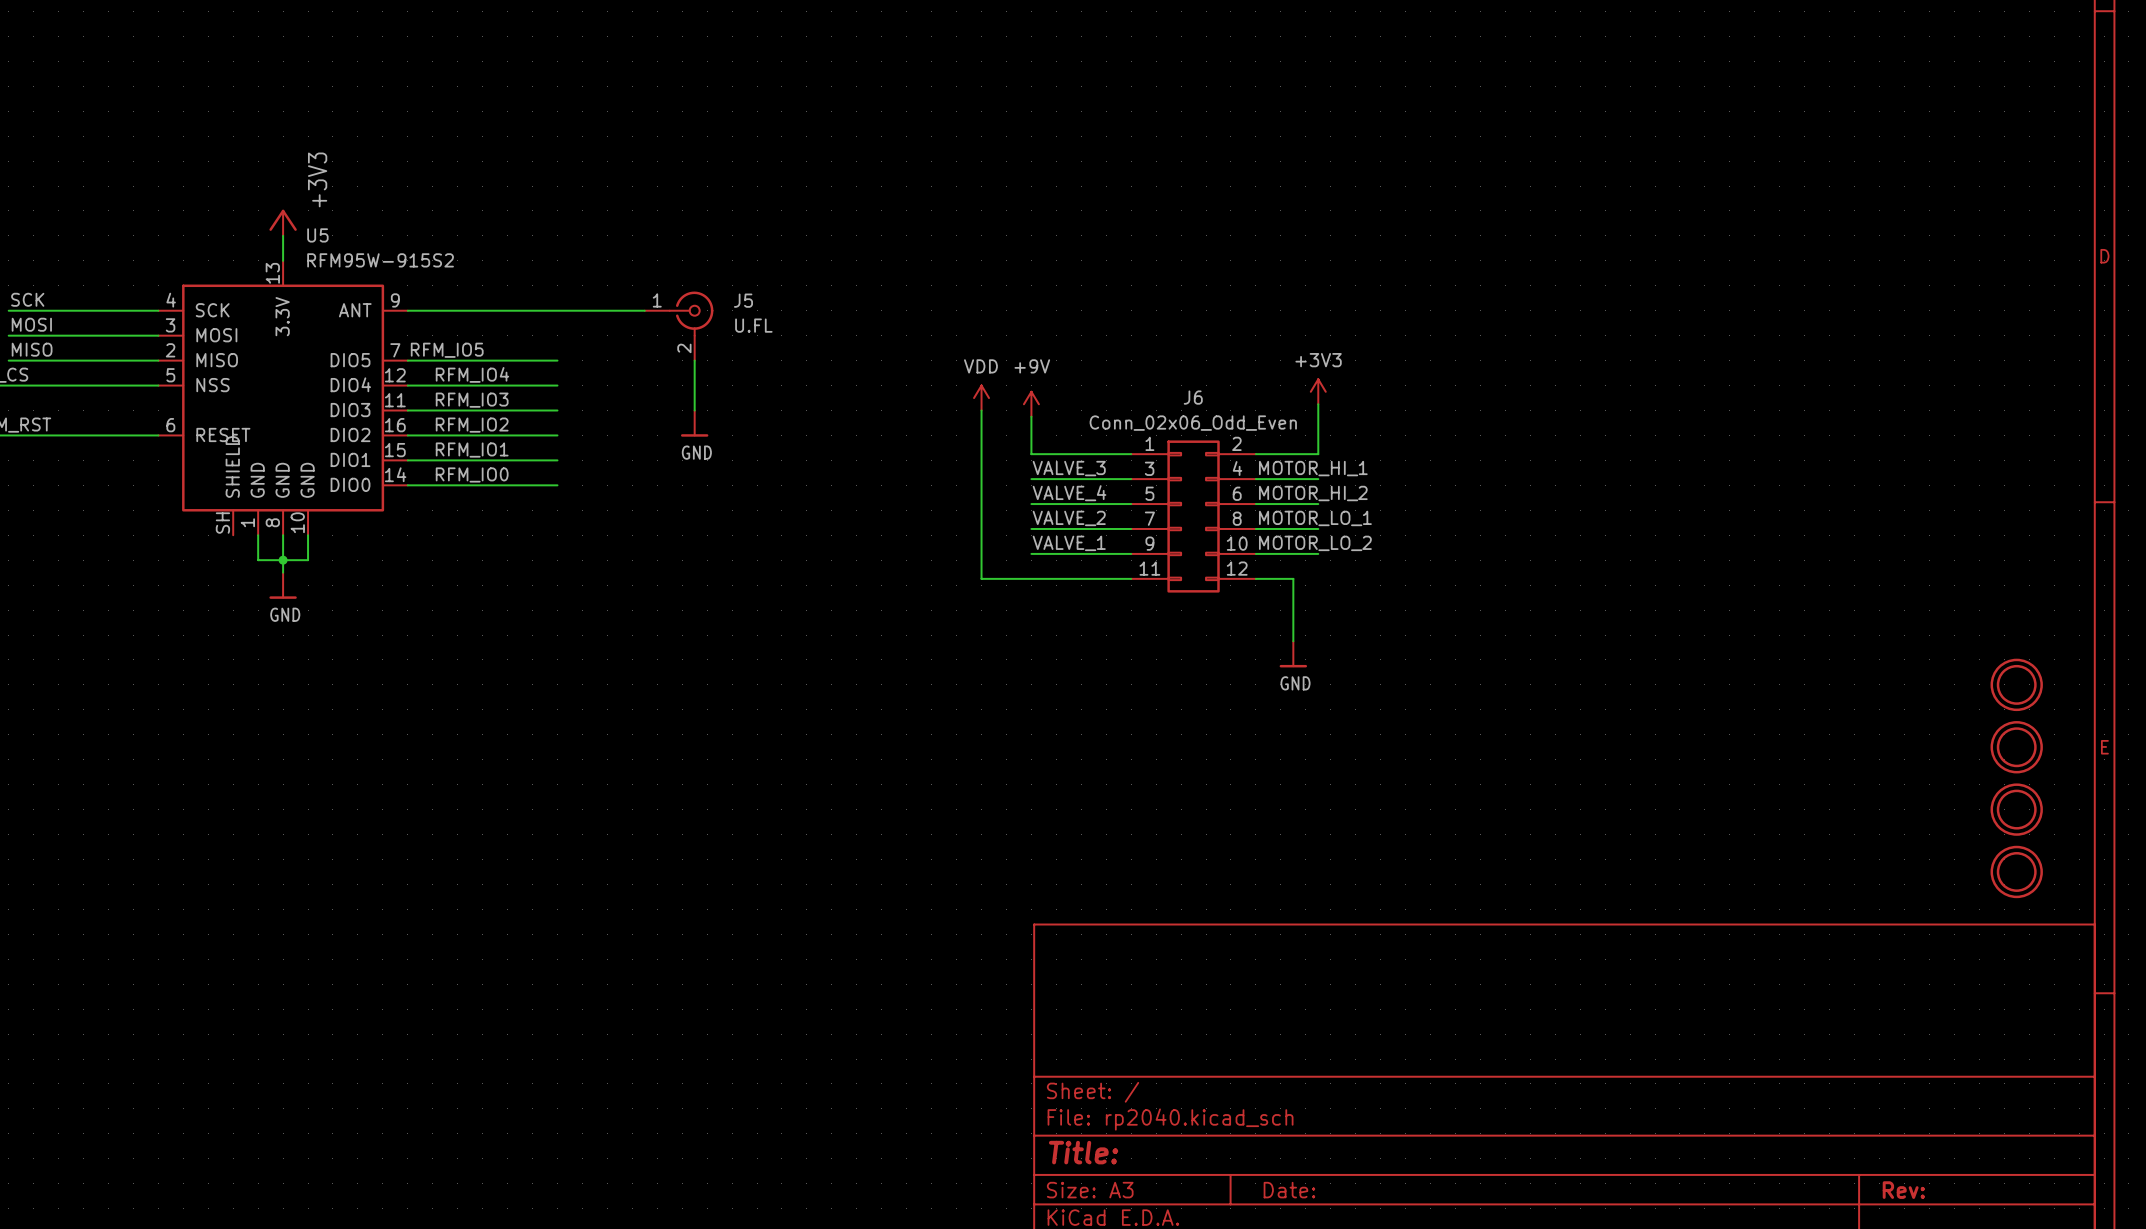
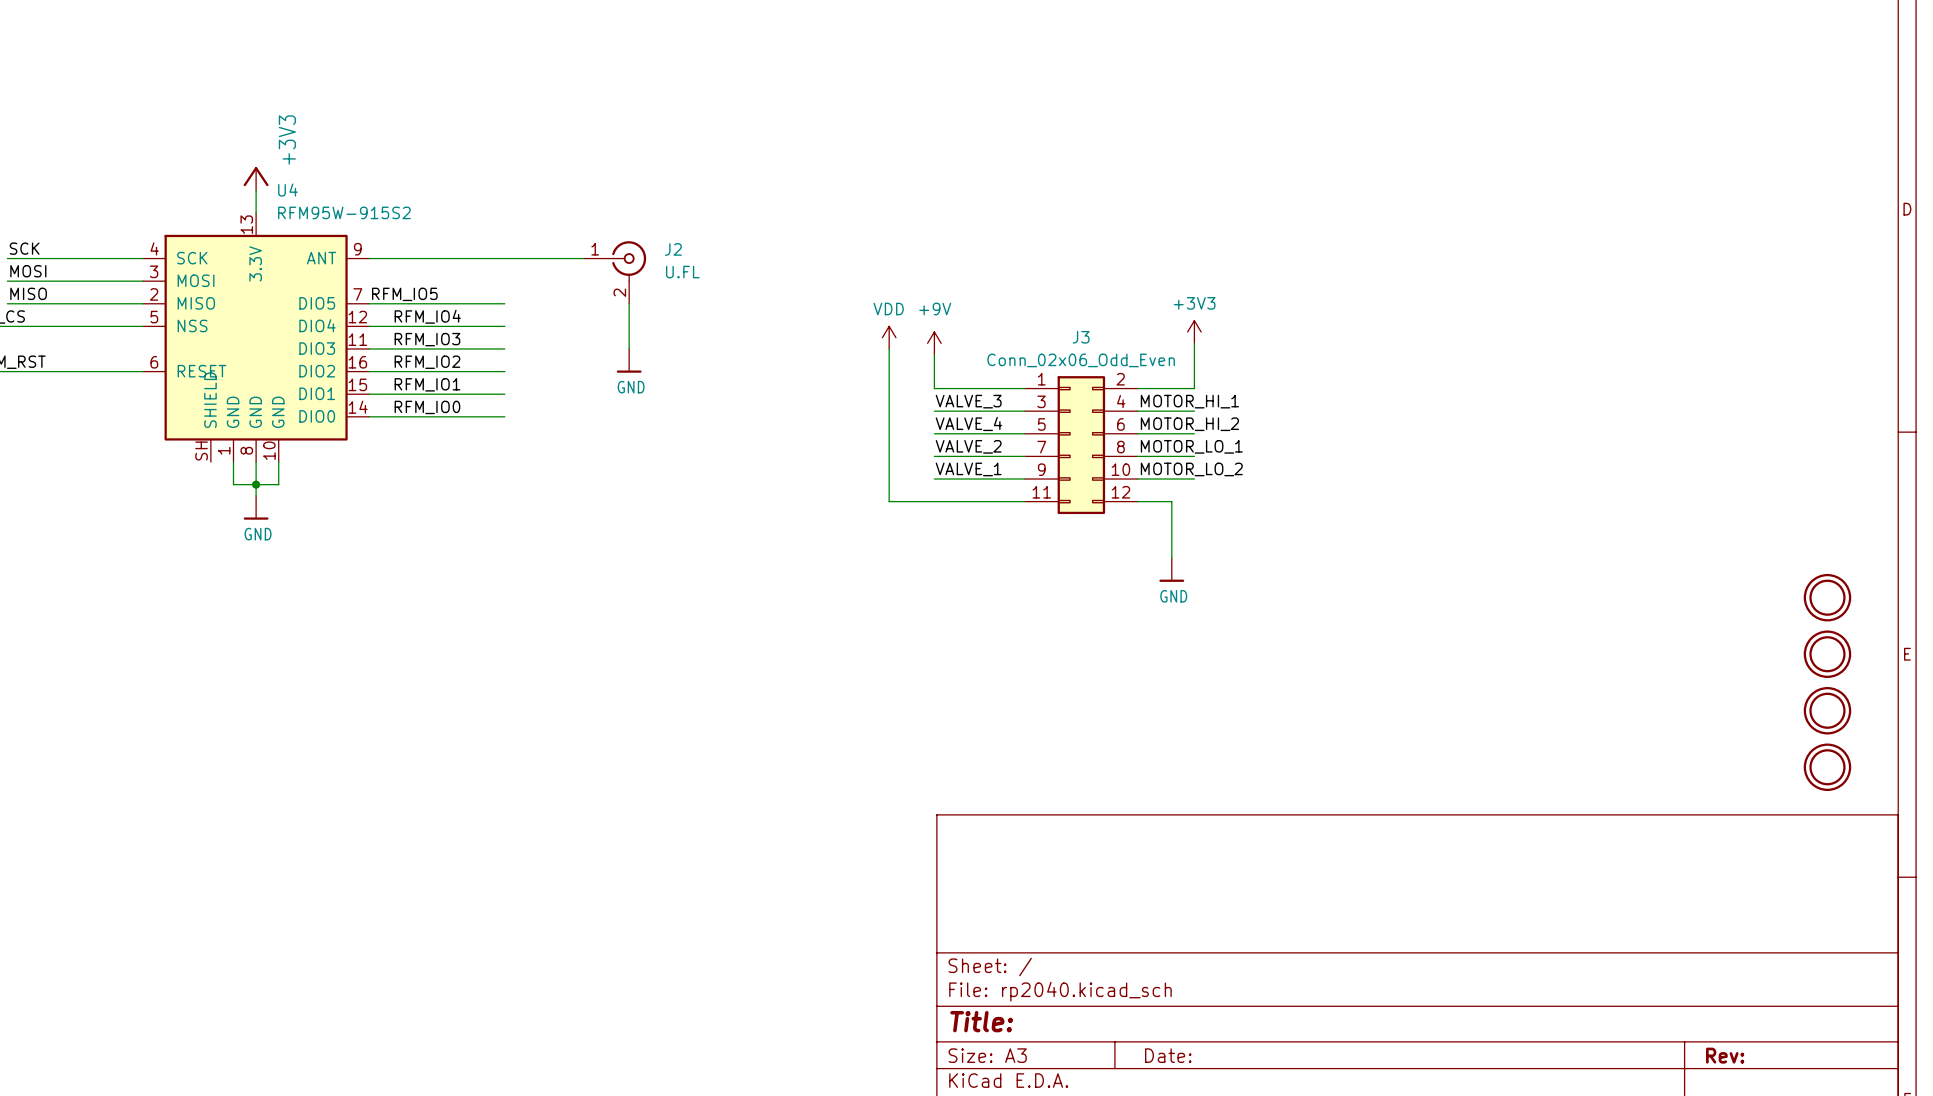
U5 name: U5 (317, 235) -> U4 (287, 190)
J5 name: J5 (743, 300) -> J2 (673, 249)
J6 name: J6 (1193, 397) -> J3 (1081, 337)

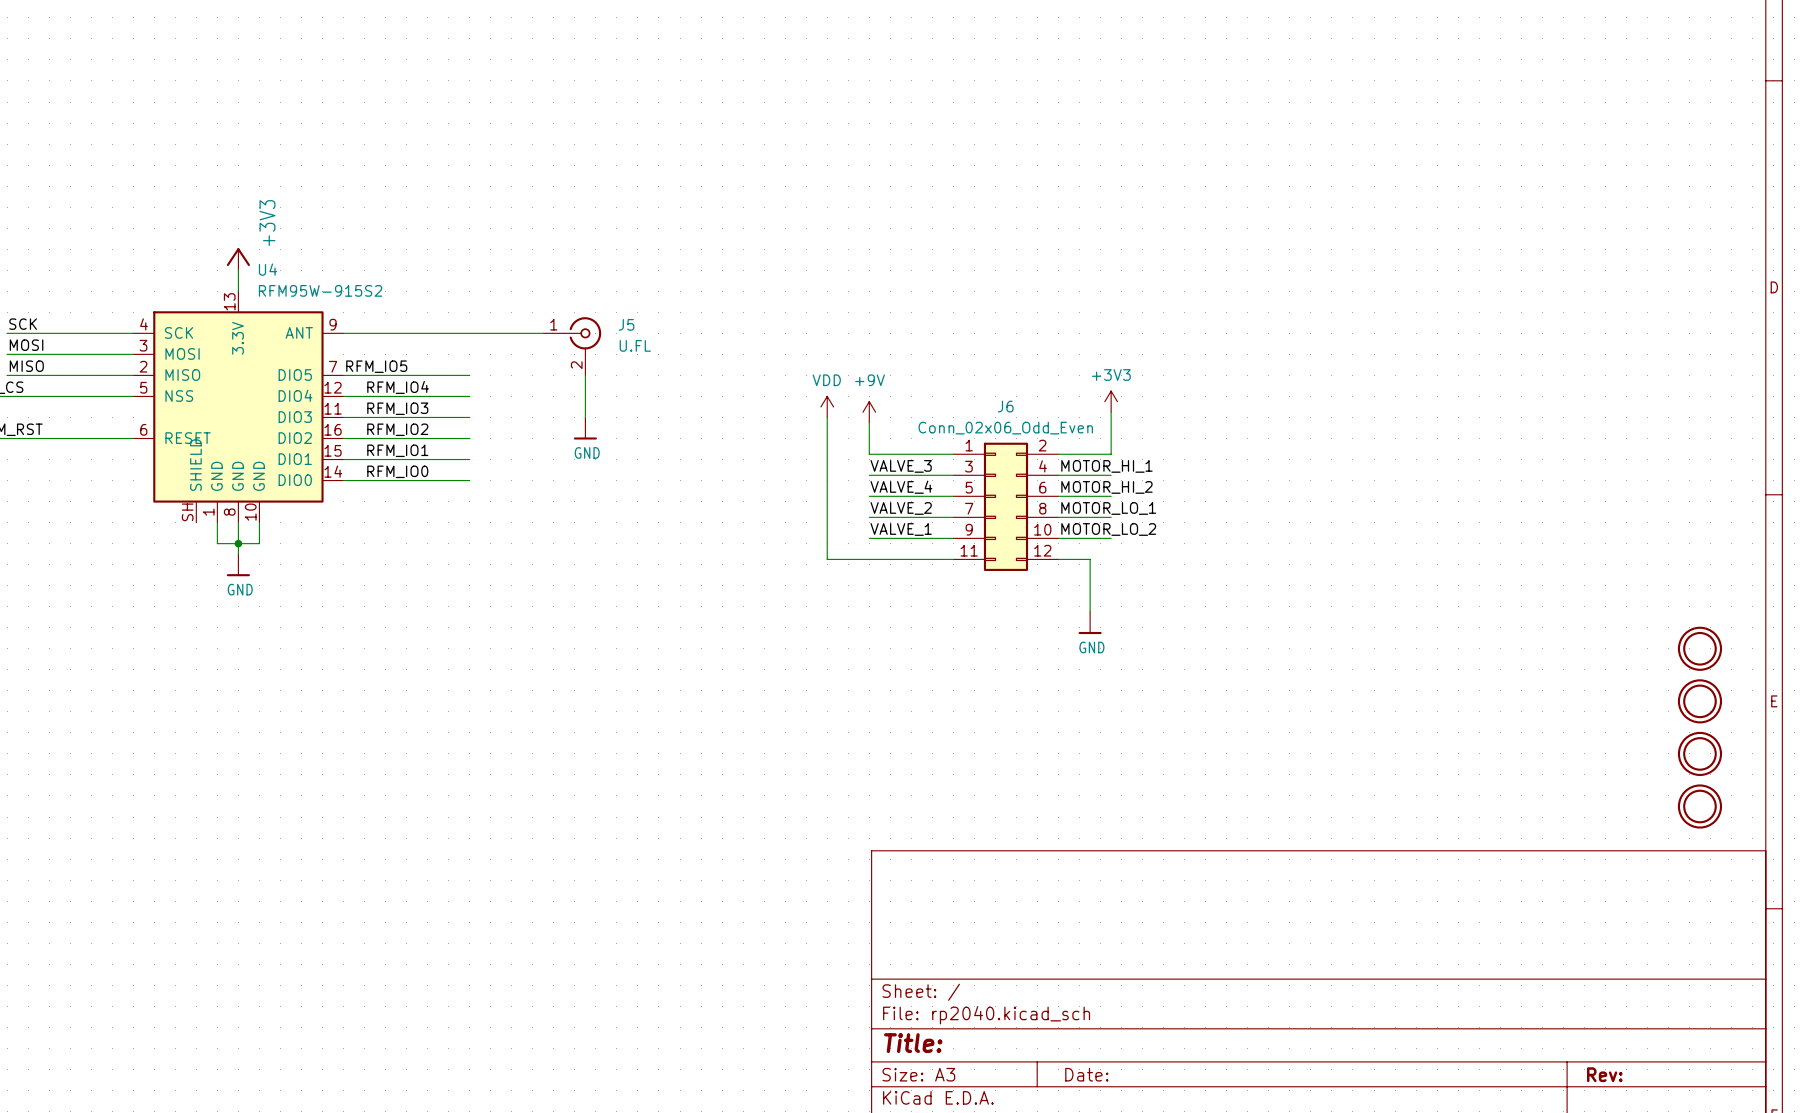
J2 name: J2 (673, 249) -> J5 (626, 324)
J3 name: J3 (1081, 337) -> J6 (1005, 406)

